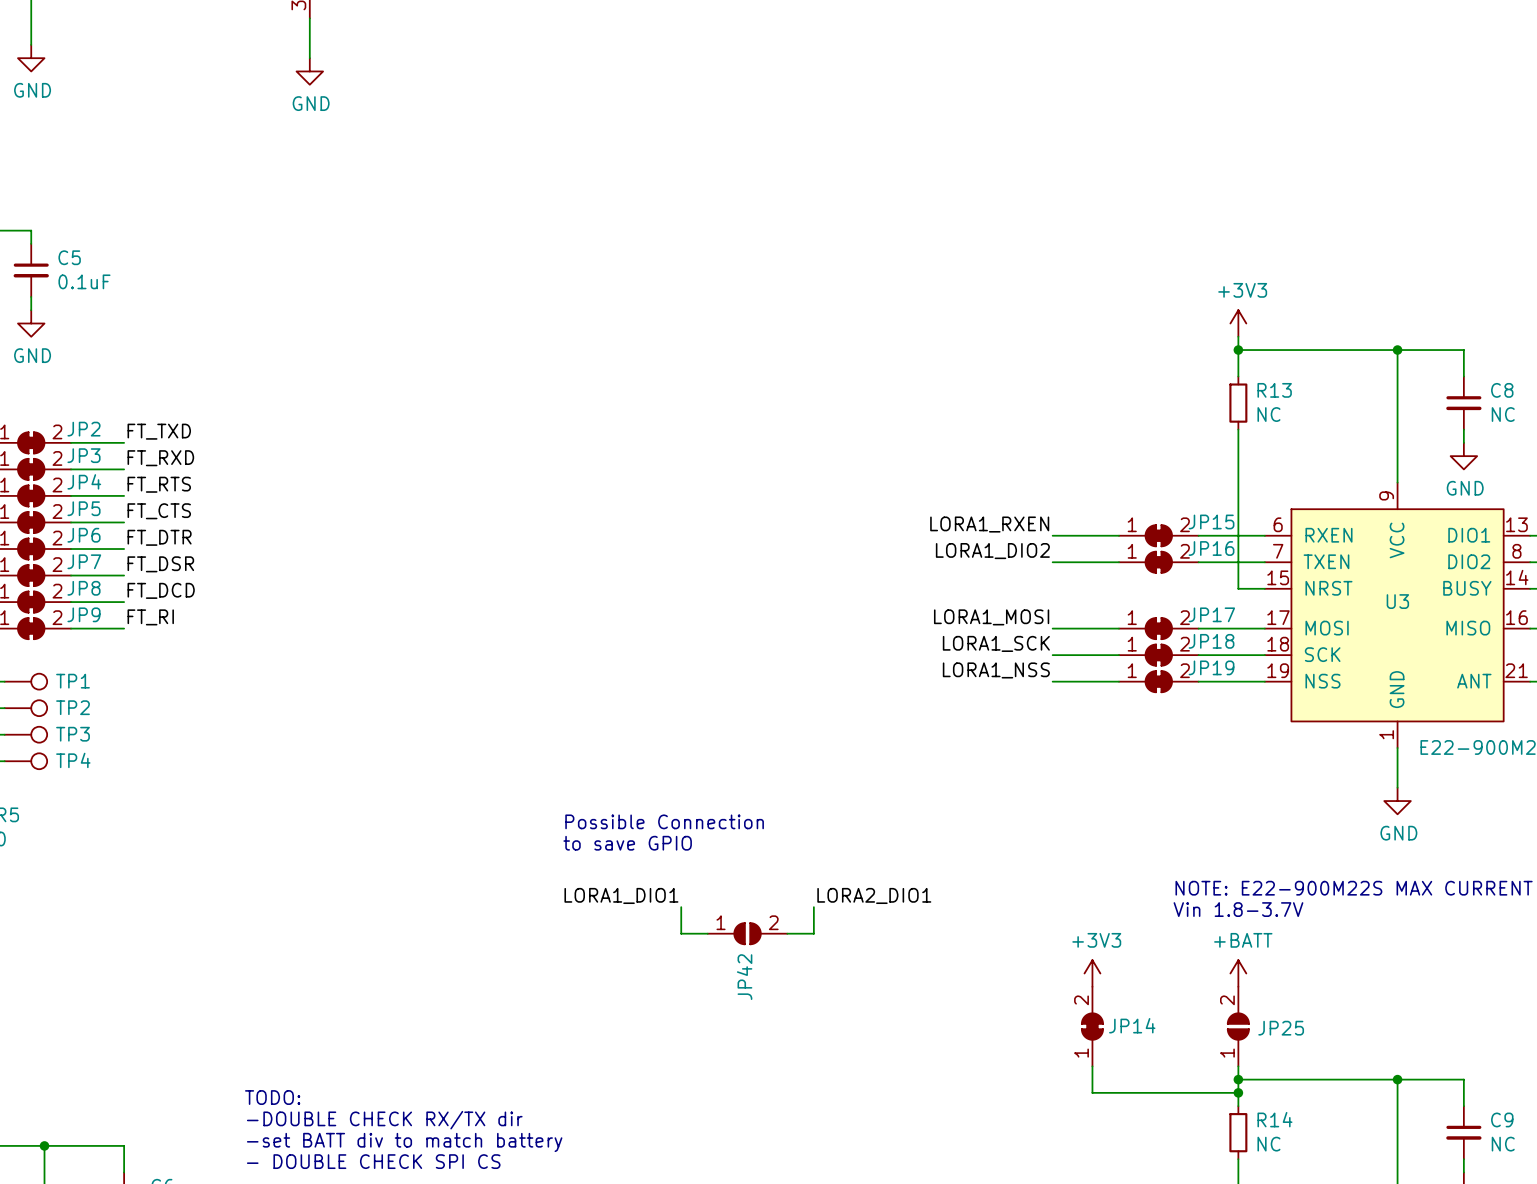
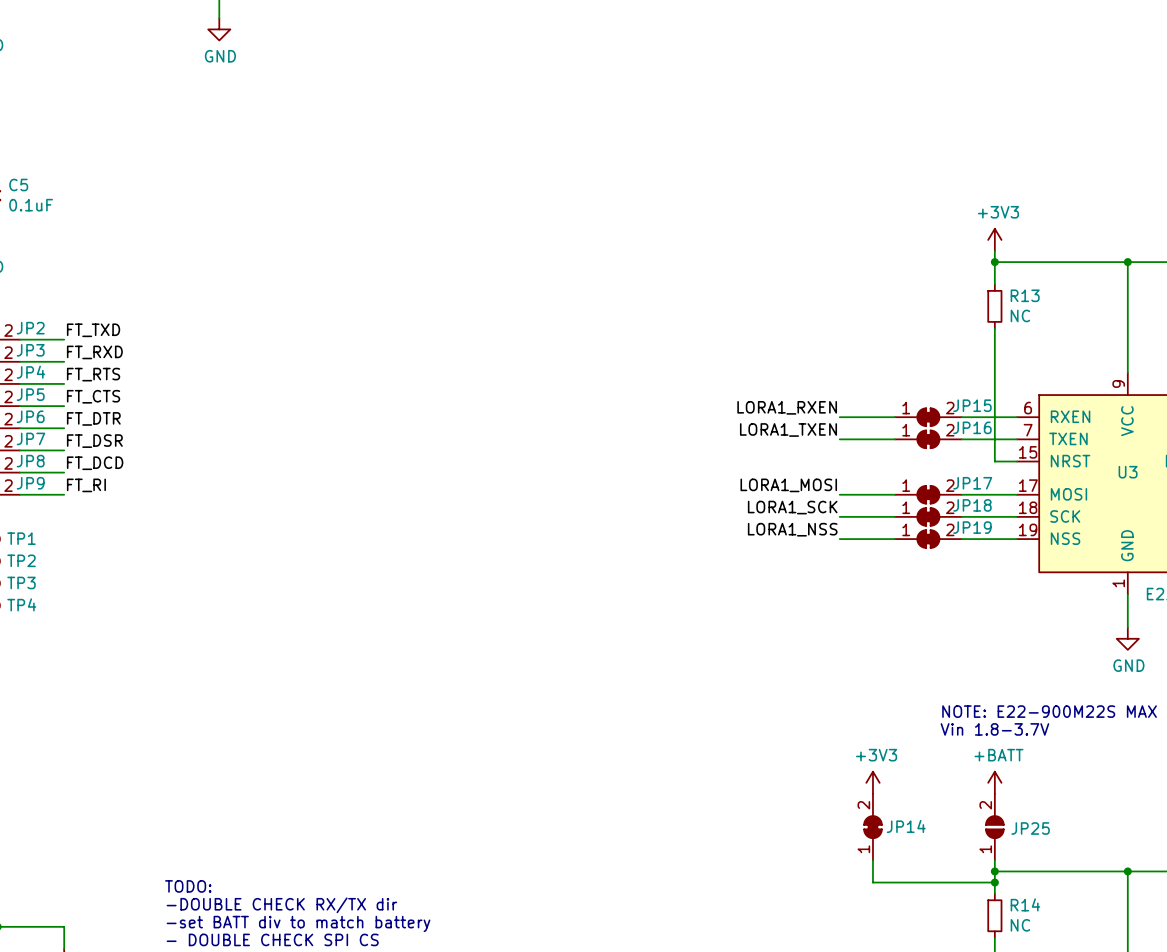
label: LORA1_DIO2 (992, 551) -> LORA1_TXEN (788, 429)
text: Possible Connection (664, 821) -> none
text: to save GPIO (627, 843) -> none
label: LORA1_DIO1 (621, 895) -> none
label: LORA2_DIO1 (874, 895) -> none
wire: (681, 907) (681, 933) (707, 933) -> none
wire: (813, 907) (813, 933) (787, 933) -> none
JP42: (747, 933) -> none

